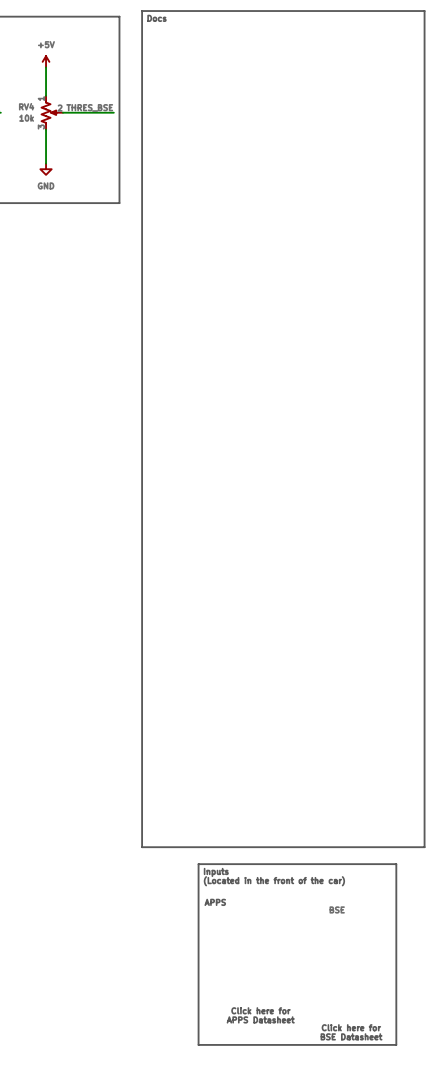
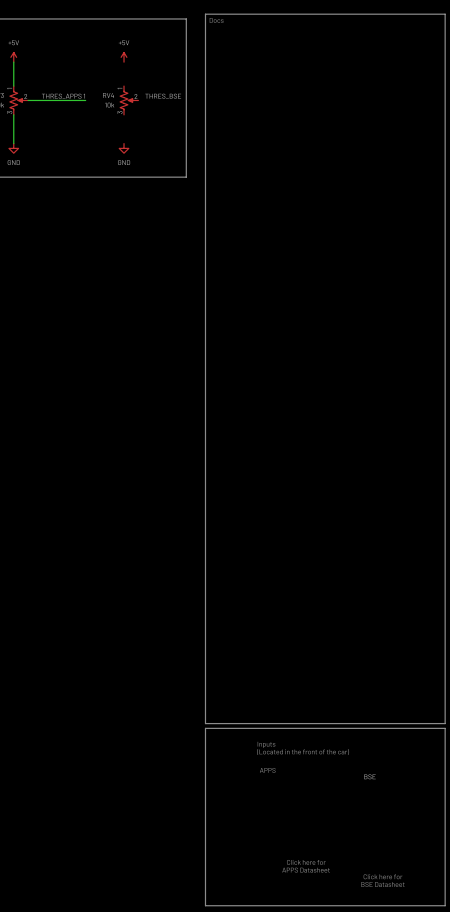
wire: (46, 67) (46, 95) -> none
wire: (62, 112) (113, 112) -> none
wire: (46, 129) (46, 163) -> none
line: (198, 864) (396, 864) (396, 1044) (198, 1044) (198, 864) -> (205, 728) (205, 905) (445, 905) (445, 728) (205, 728)

